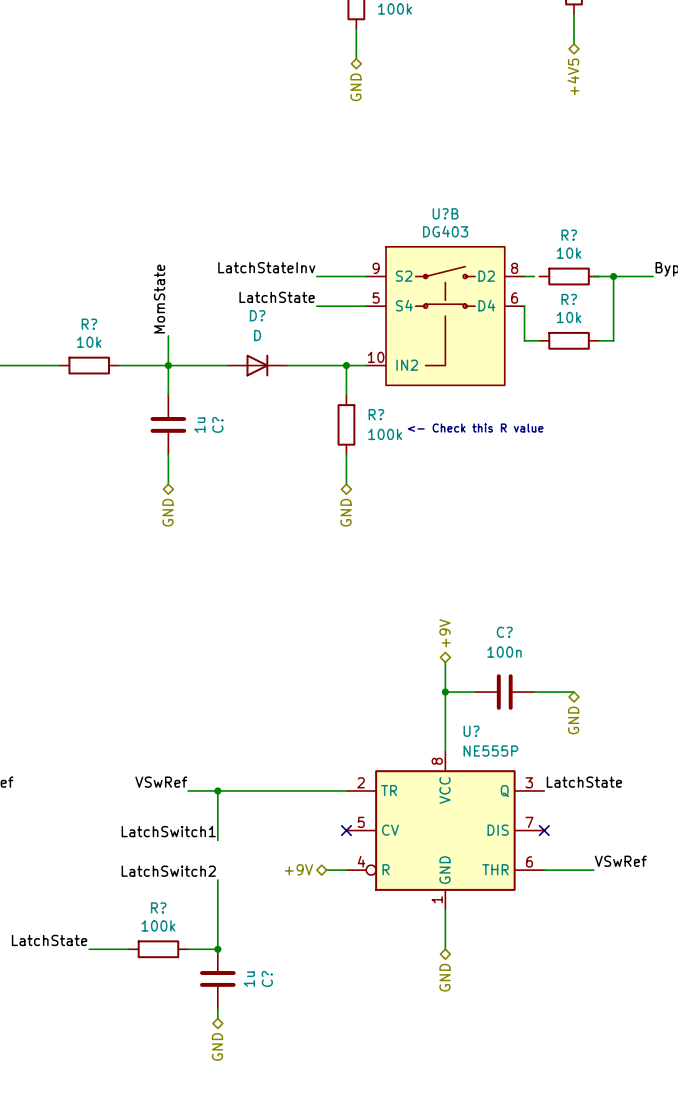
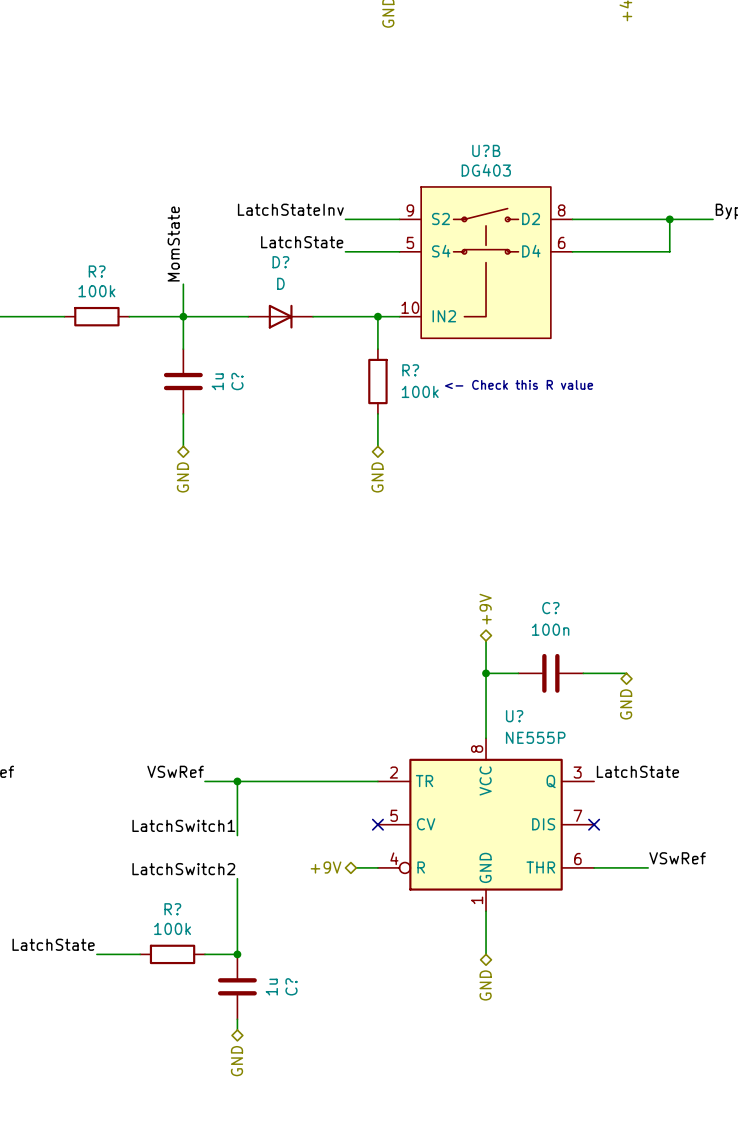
wire: none -> (583, 219) (648, 219)
R?: 10k (569, 276) -> none
wire: (524, 306) (524, 340) (539, 340) -> (572, 251) (669, 251)
wire: (613, 306) (613, 340) (598, 340) -> none
R?: 10k (569, 340) -> none
R? value: 10k (89, 342) -> 100k (96, 291)

